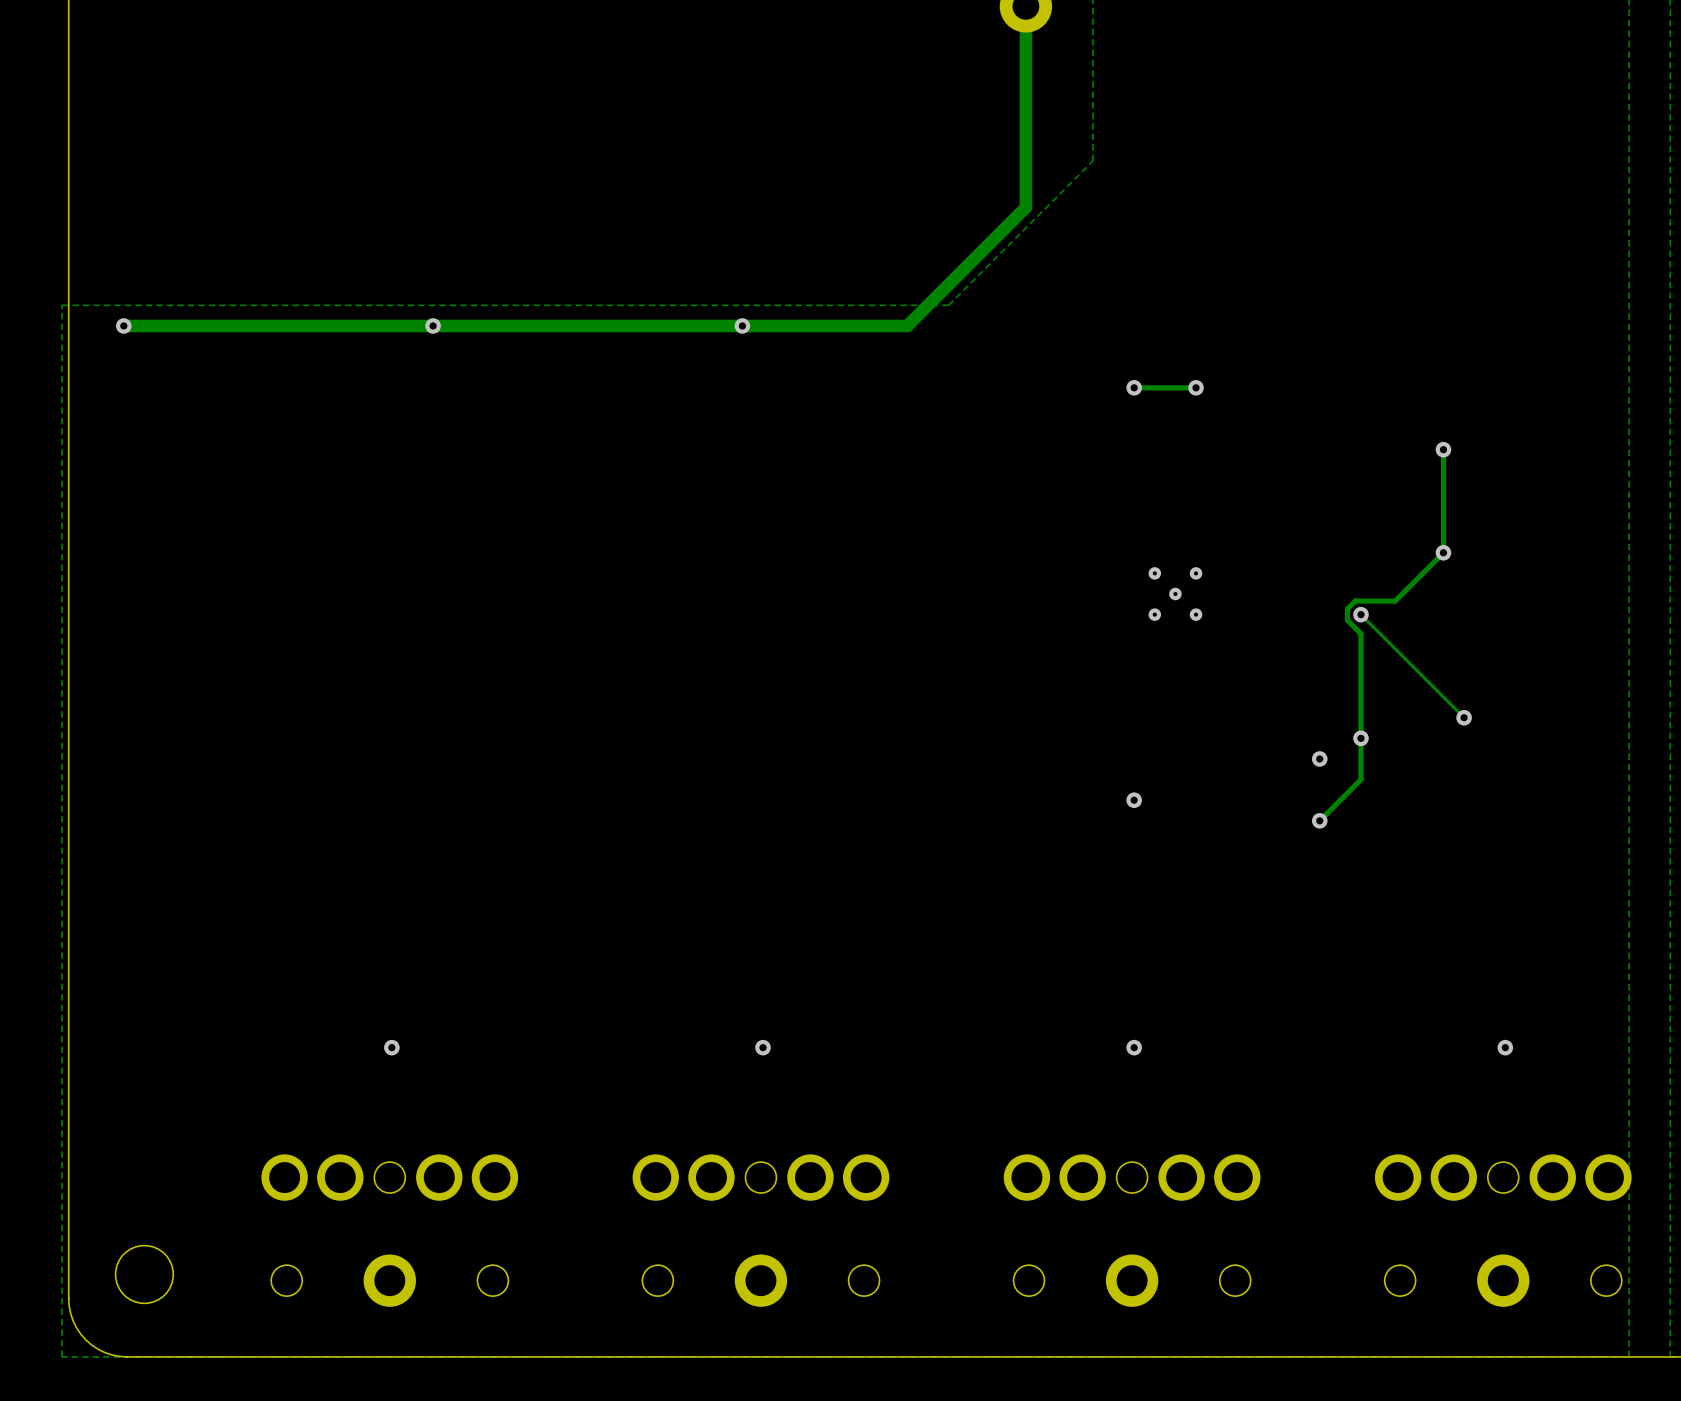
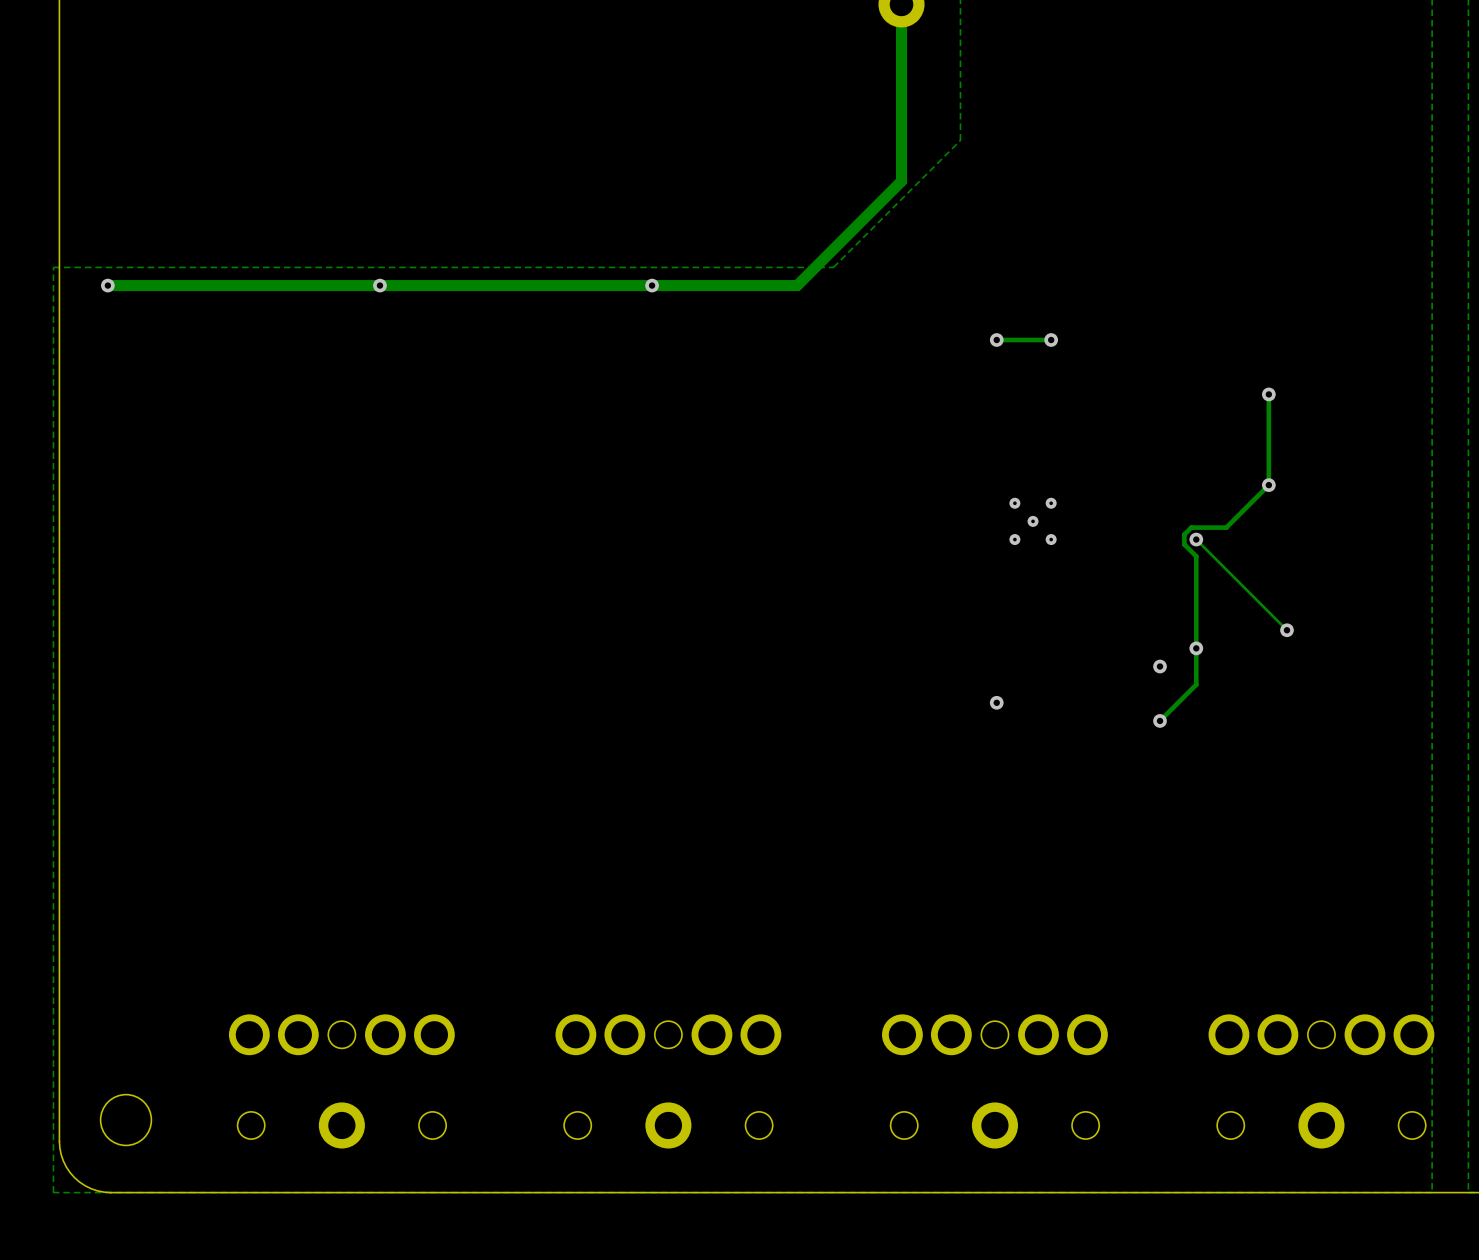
via: (391, 1047) -> none
via: (763, 1047) -> none
via: (1134, 1047) -> none
via: (1505, 1047) -> none

